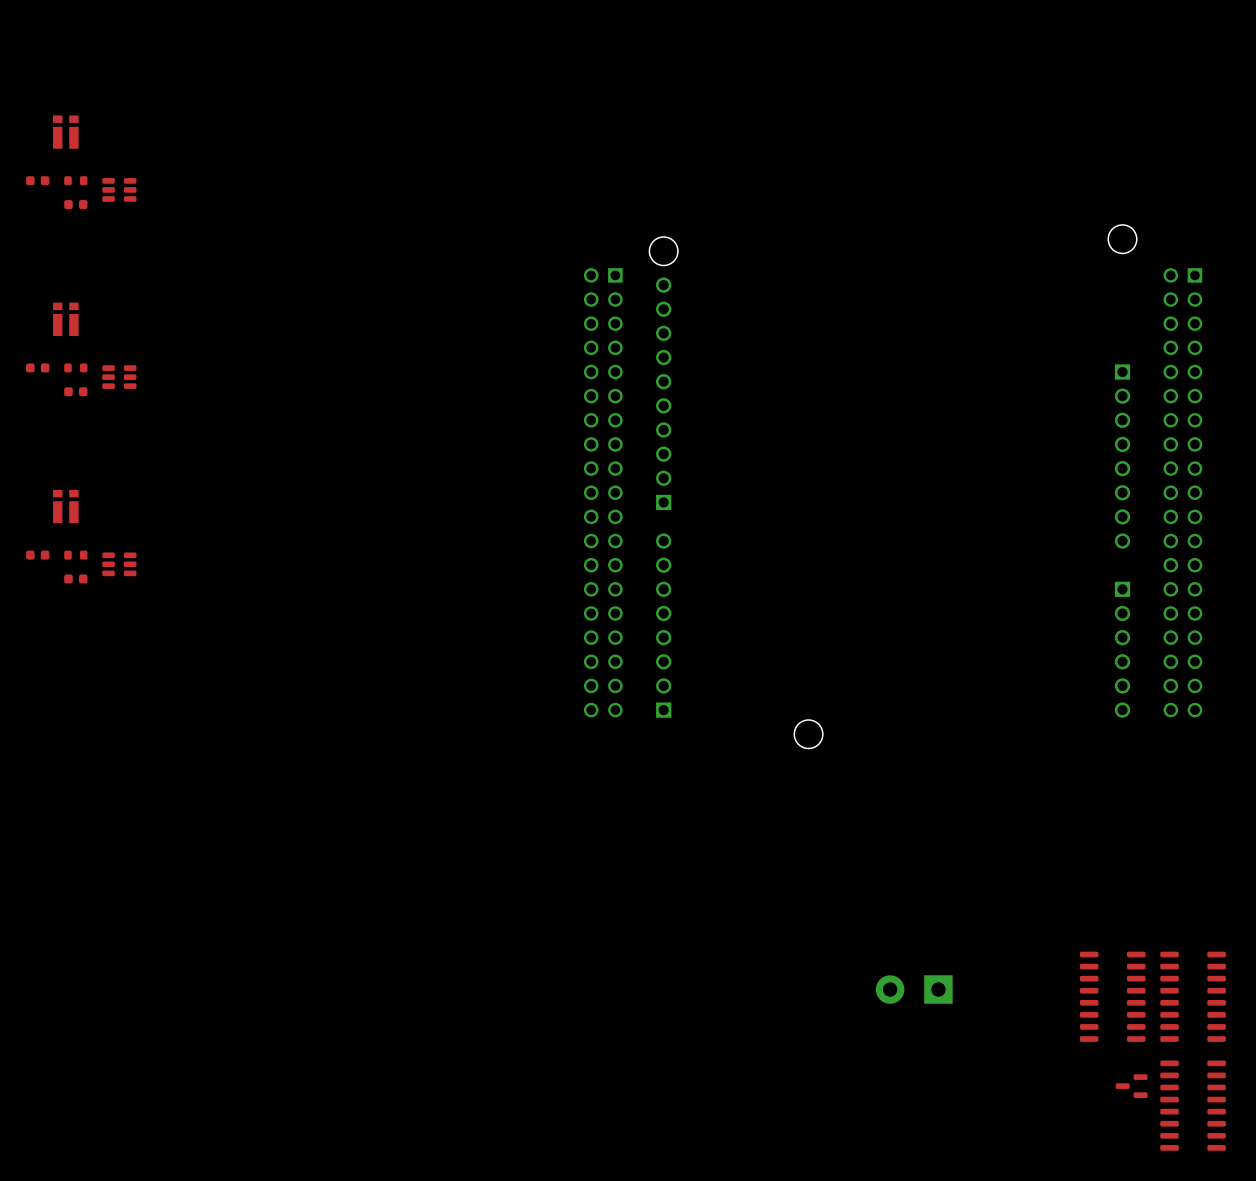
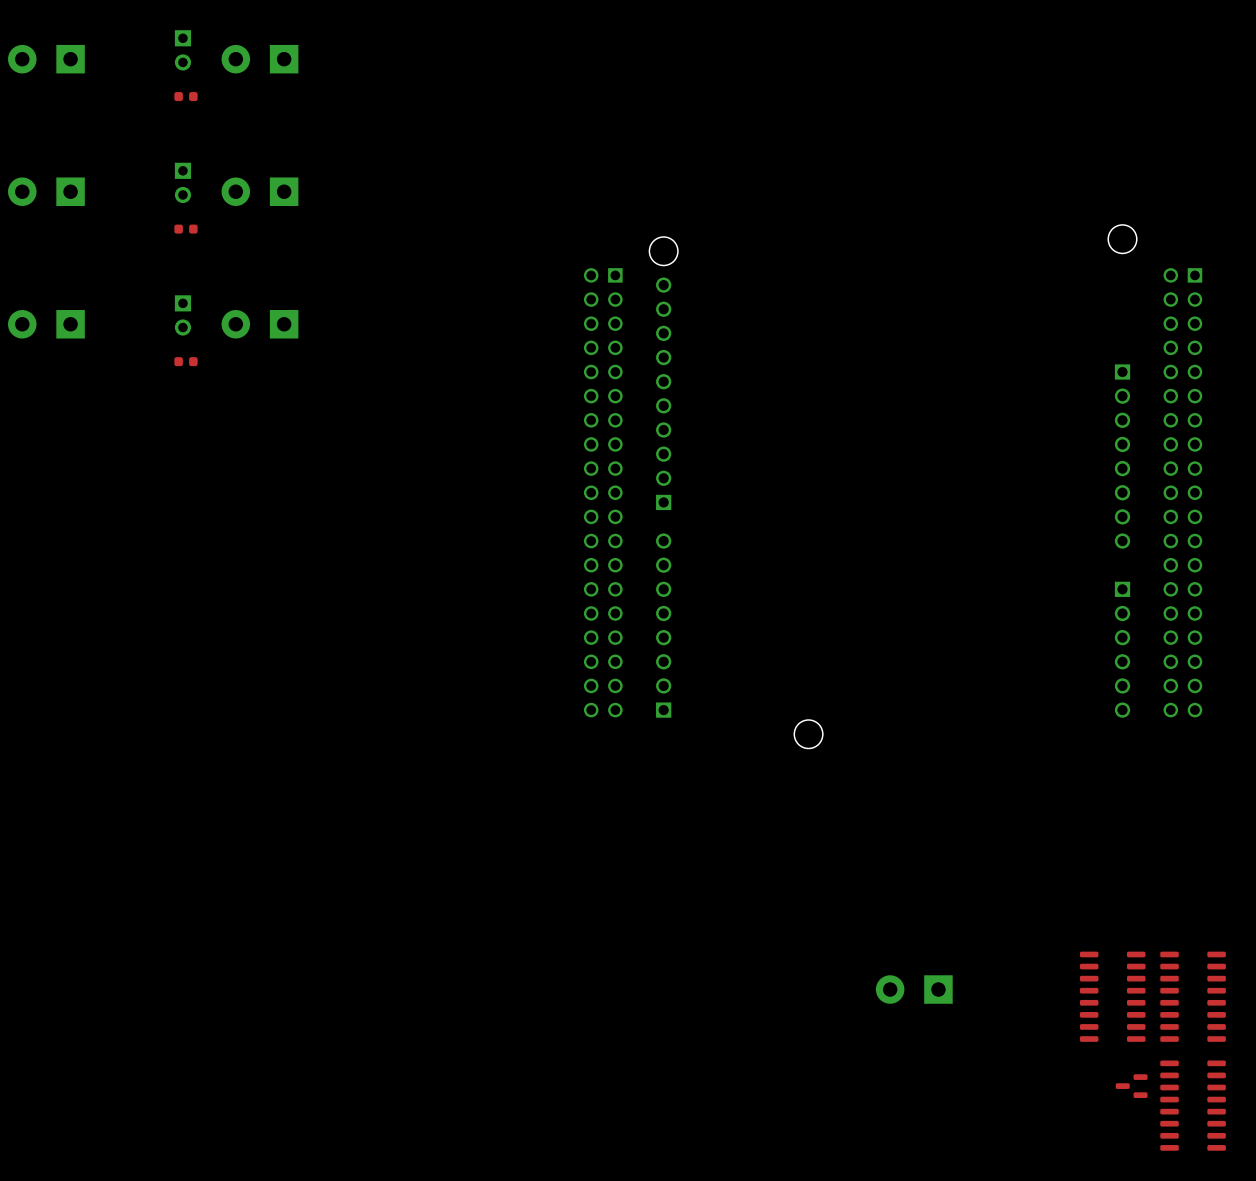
part: none -> (182, 50)
part: none -> (46, 59)
part: none -> (259, 59)
part: none -> (186, 96)
part: (65, 132) -> none
part: (37, 180) -> none
part: (75, 180) -> none
part: none -> (182, 182)
part: (119, 189) -> none
part: none -> (46, 191)
part: none -> (259, 191)
part: (75, 204) -> none
part: none -> (186, 229)
part: none -> (182, 315)
part: (65, 319) -> none
part: none -> (46, 324)
part: none -> (259, 324)
part: none -> (186, 361)
part: (37, 367) -> none
part: (75, 367) -> none
part: (119, 377) -> none
part: (75, 391) -> none
part: (65, 506) -> none
part: (37, 555) -> none
part: (75, 555) -> none
part: (119, 564) -> none
part: (75, 578) -> none

